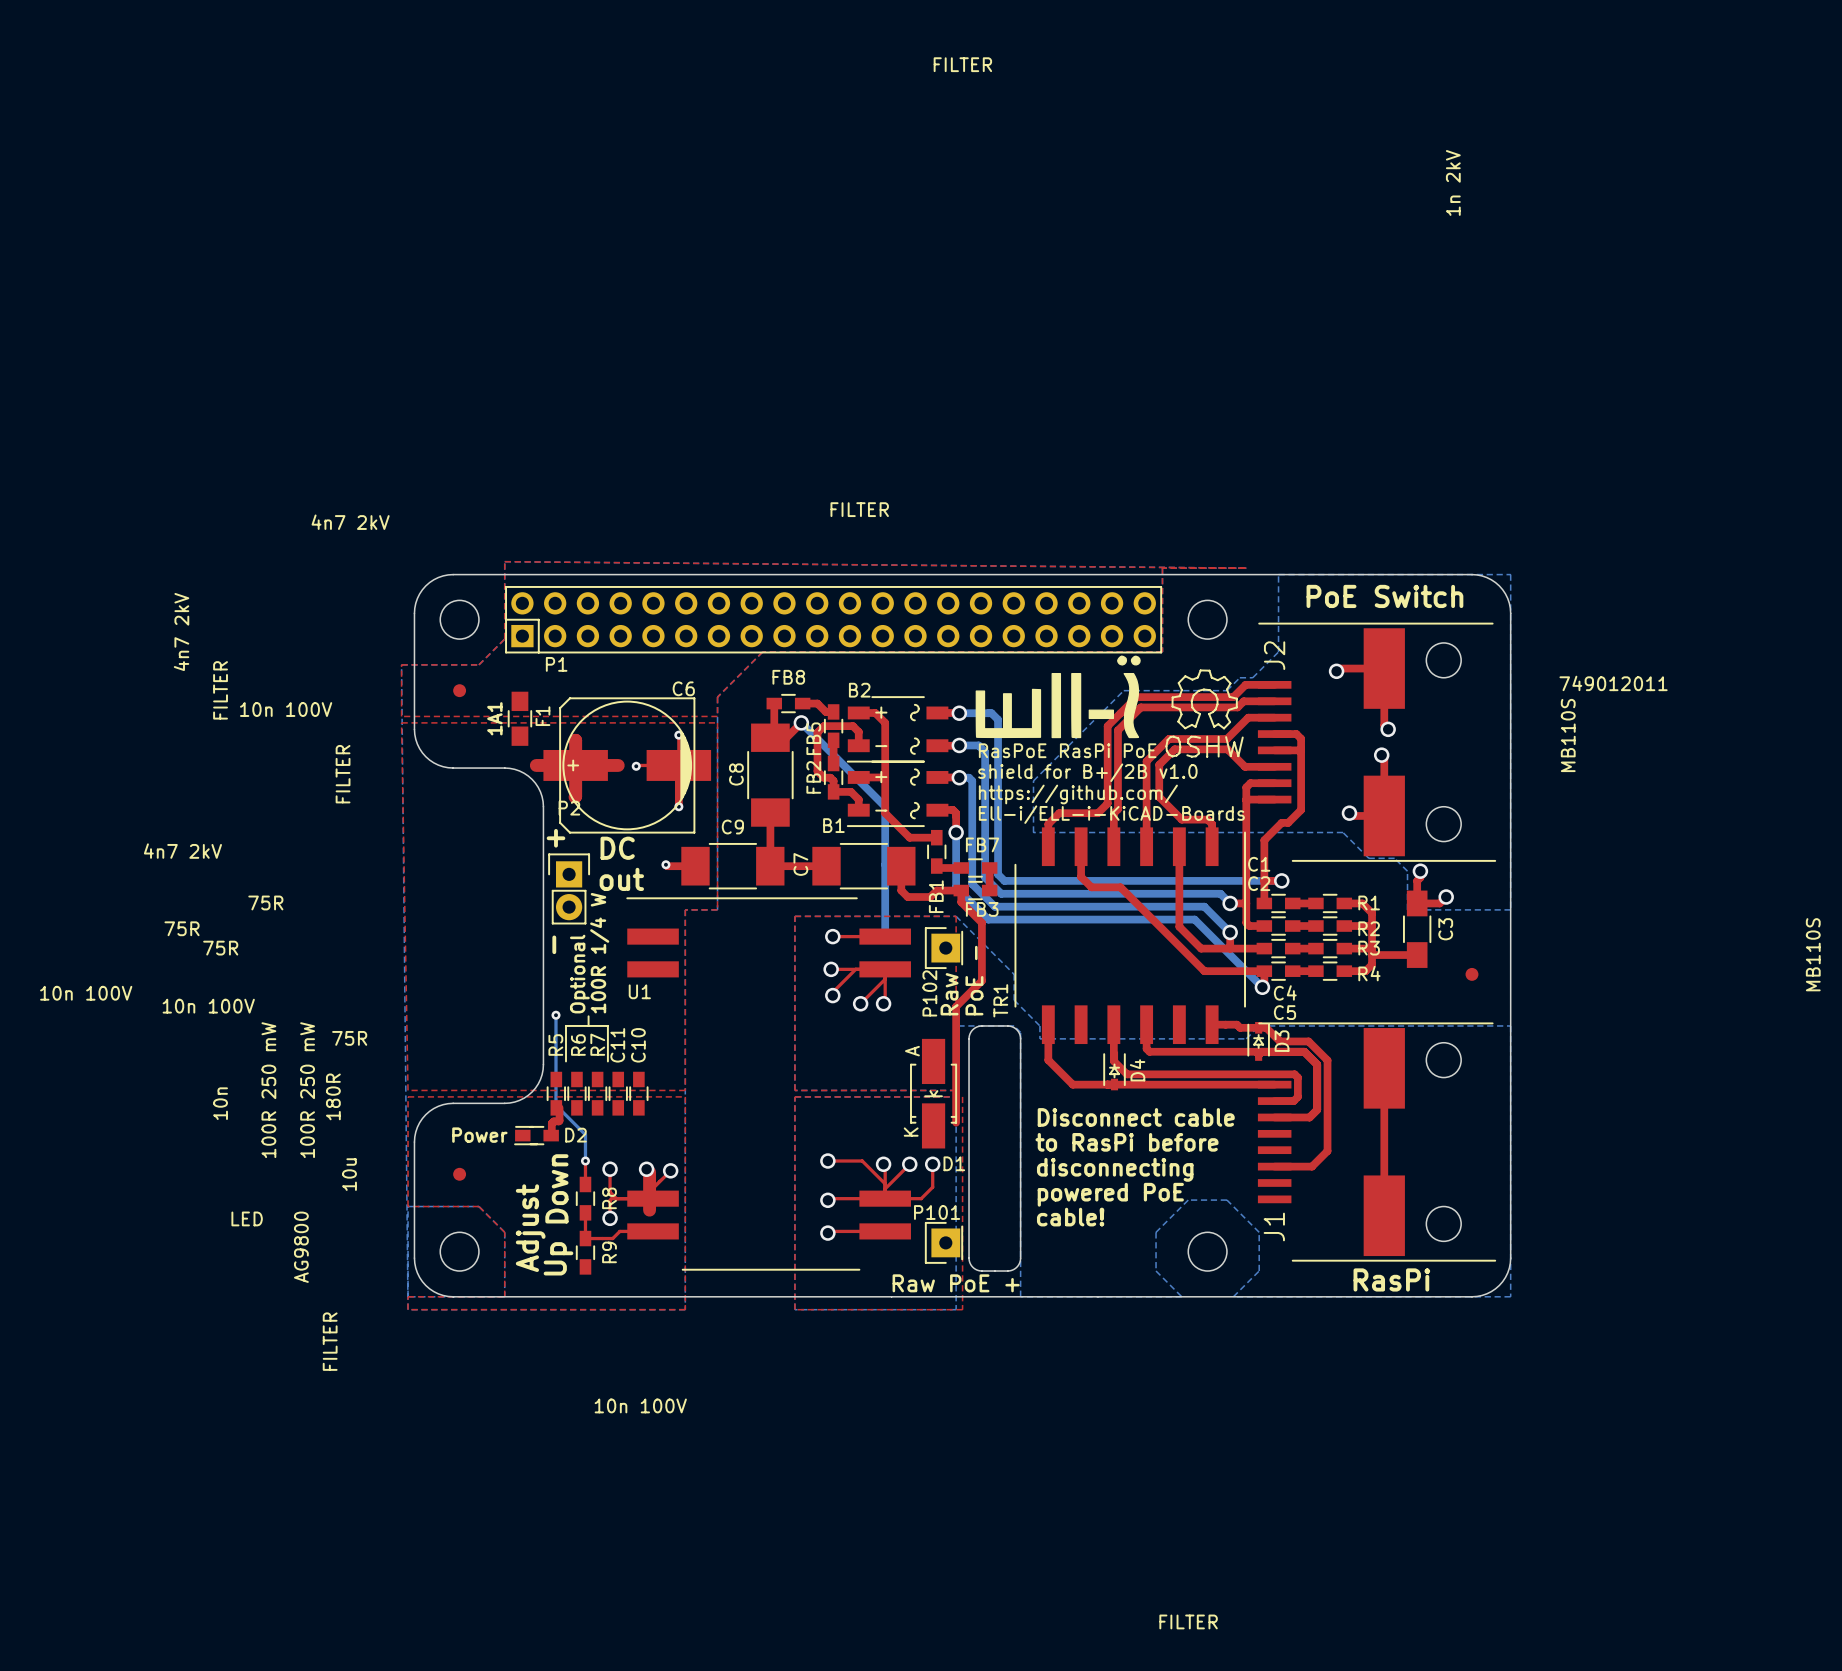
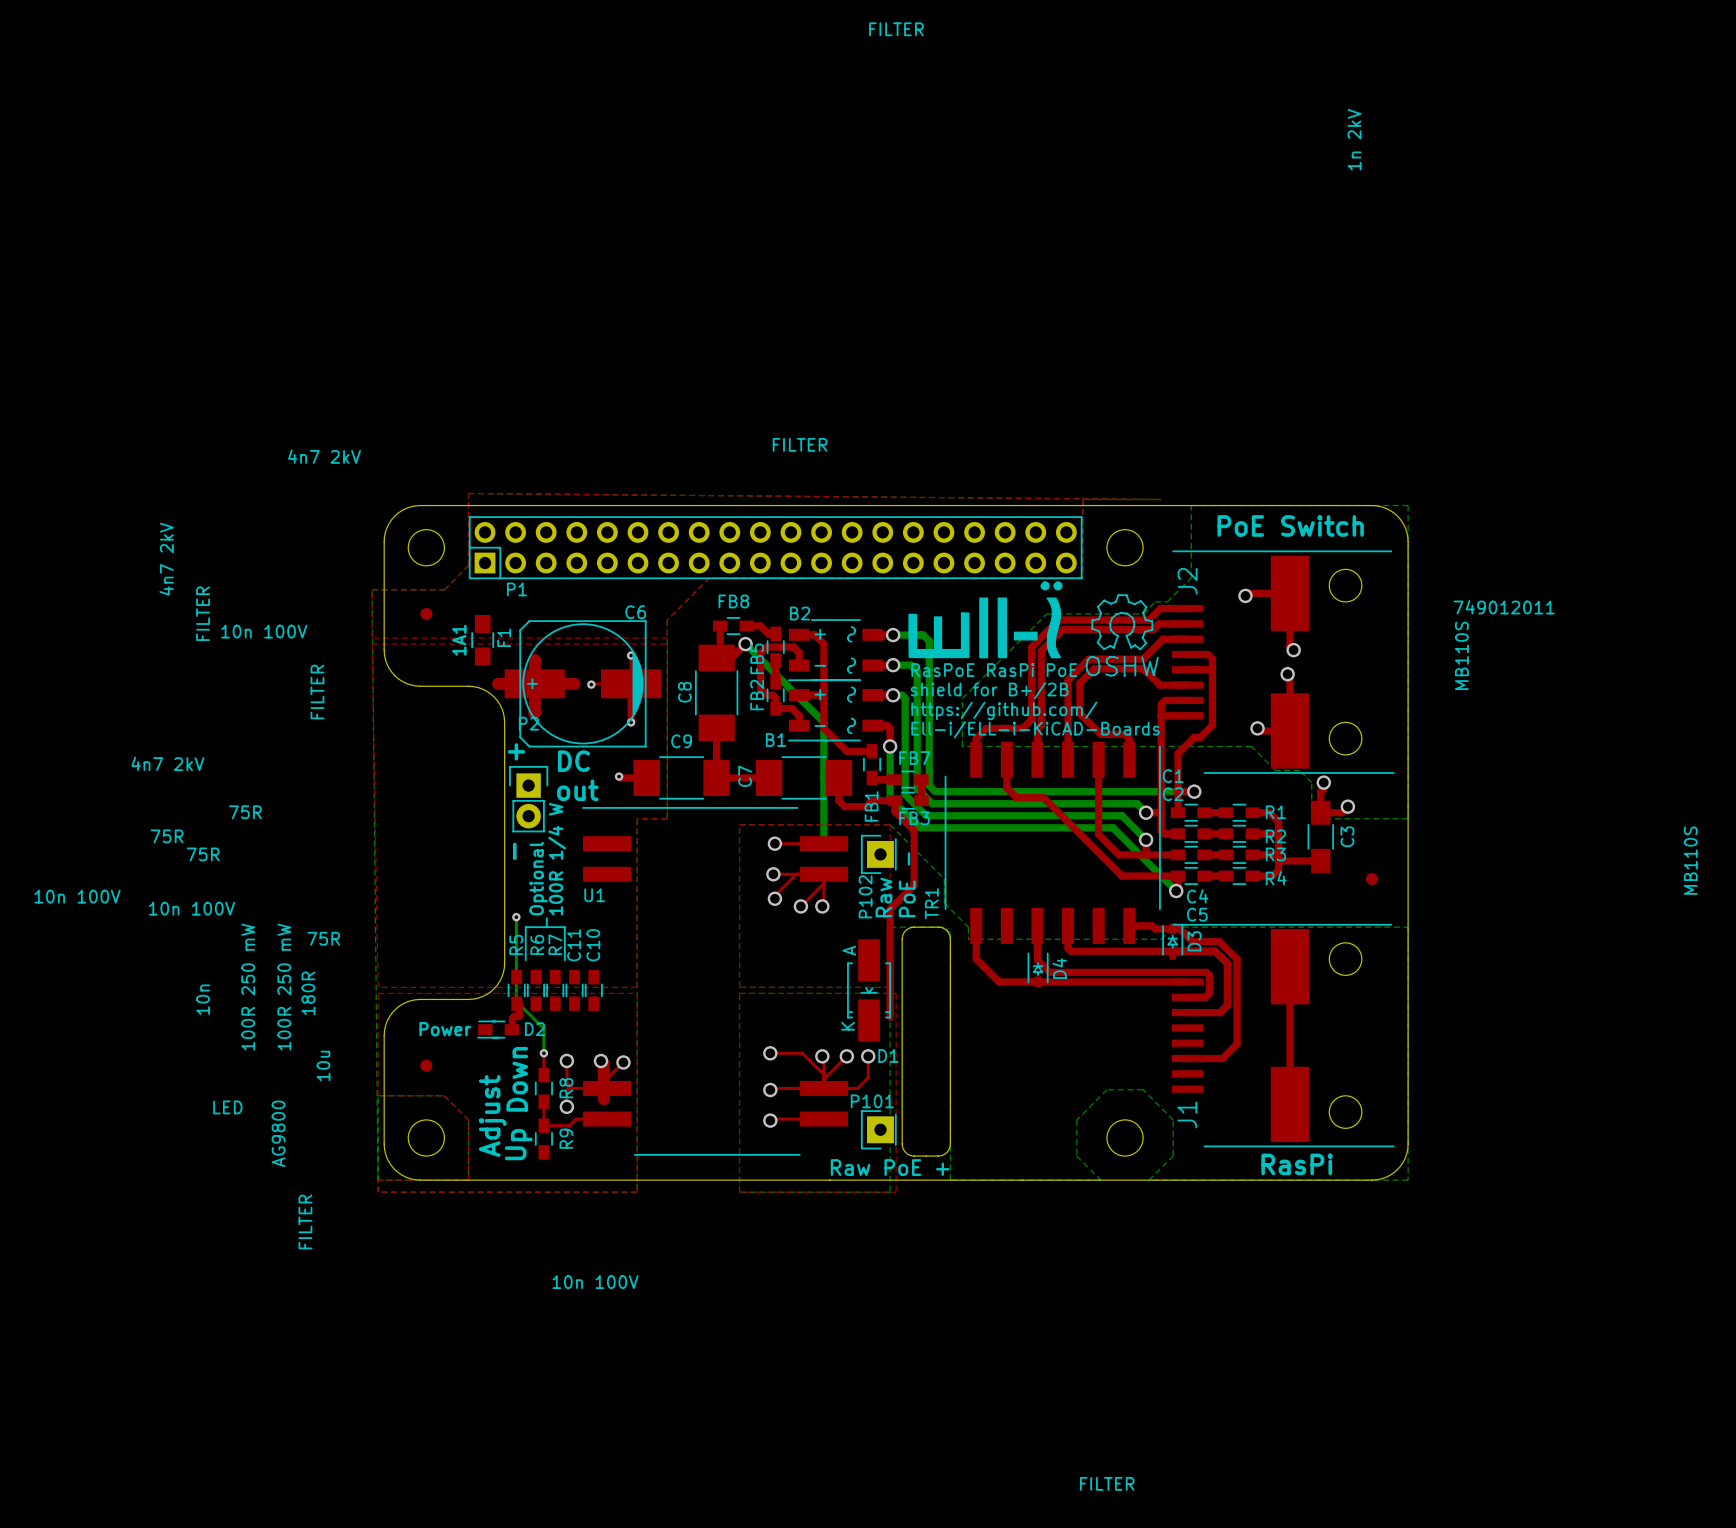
text: shield for B+/2B v1.0 (1087, 772) -> shield for B+/2B (989, 690)
text: Disconnect cable (1136, 1117) -> none
text: to RasPi before (1127, 1142) -> none
text: disconnecting (1115, 1169) -> none
text: powered PoE (1110, 1194) -> none
text: cable! (1070, 1217) -> none

